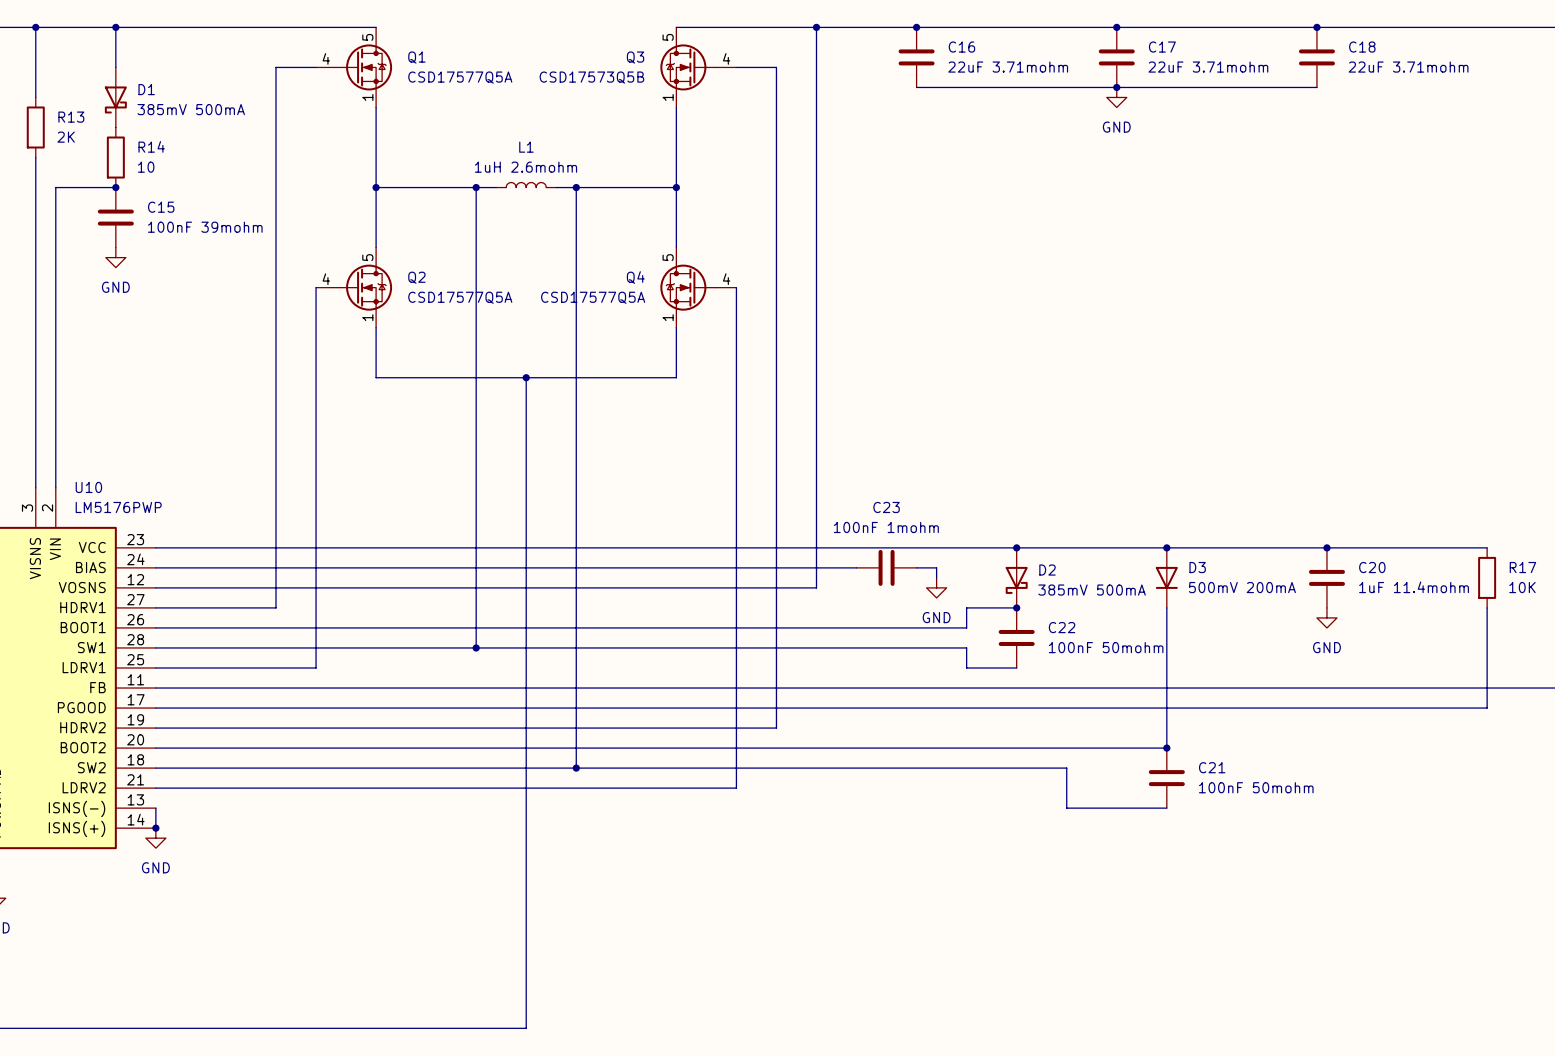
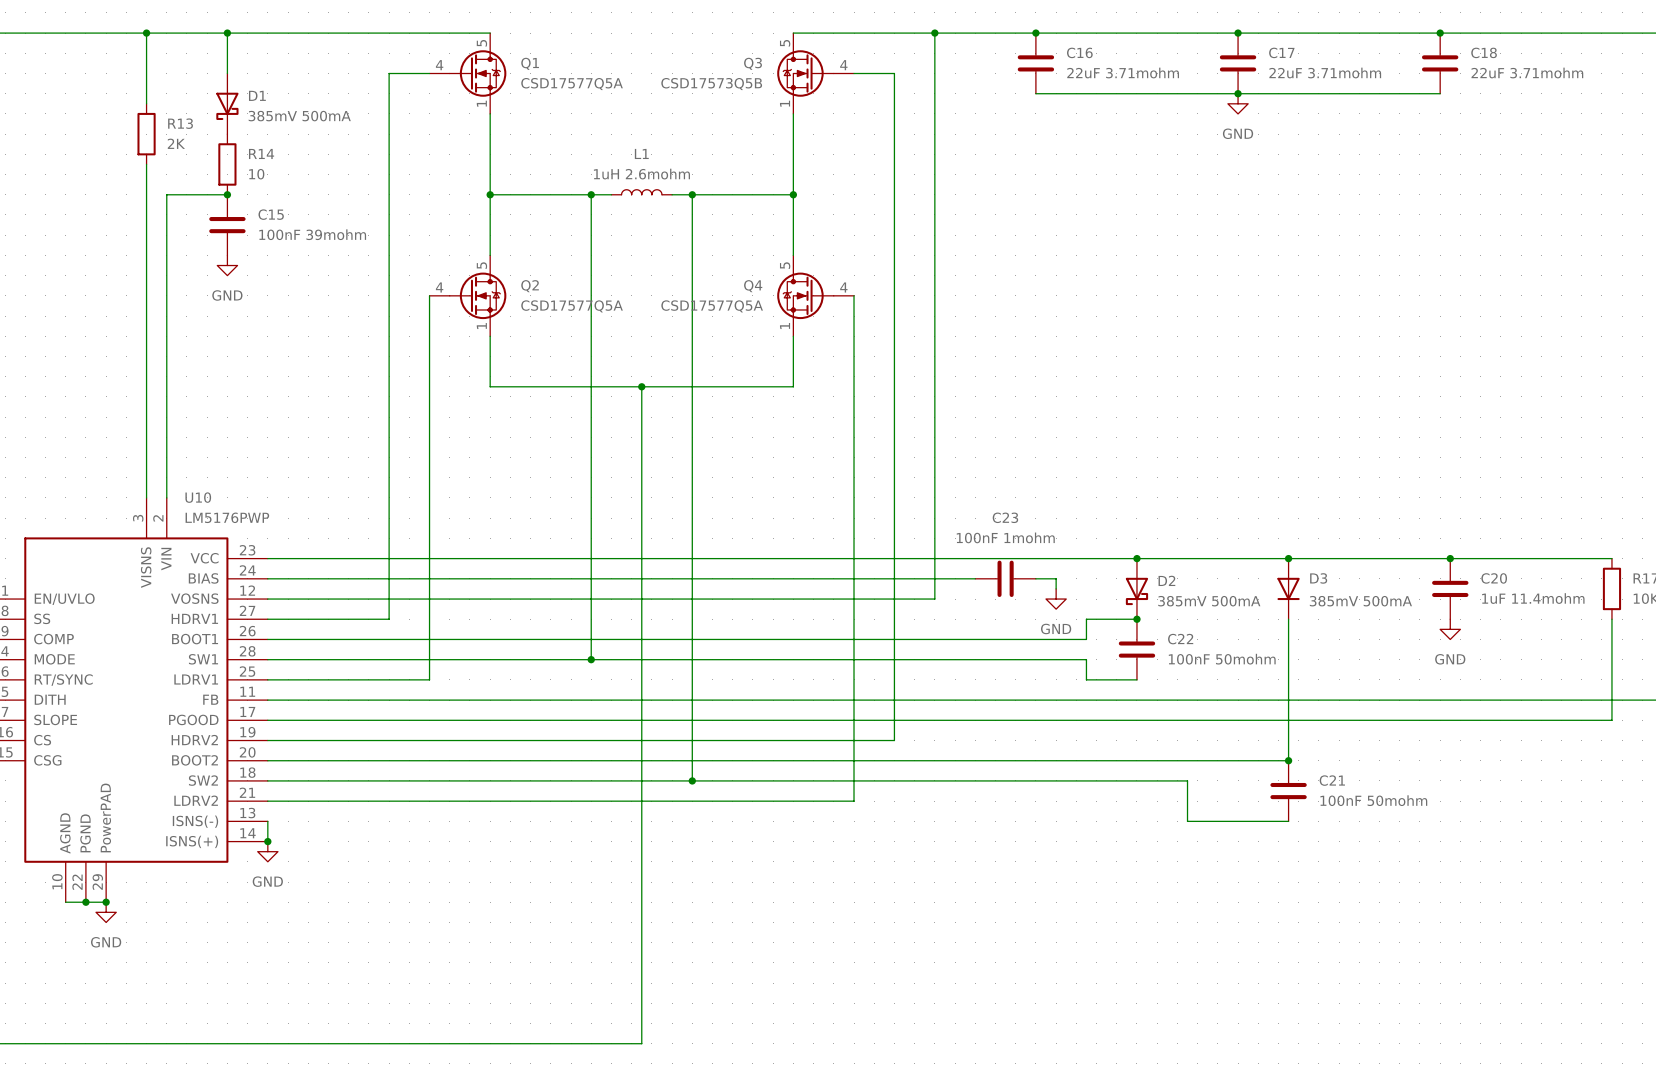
D3 value: 500mV 200mA (1242, 587) -> 385mV 500mA (1360, 601)

